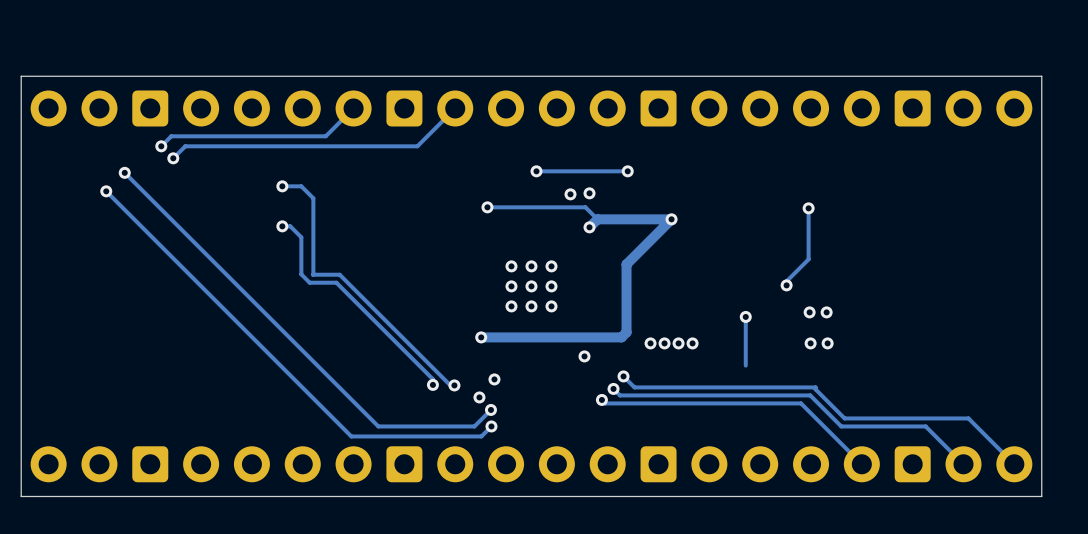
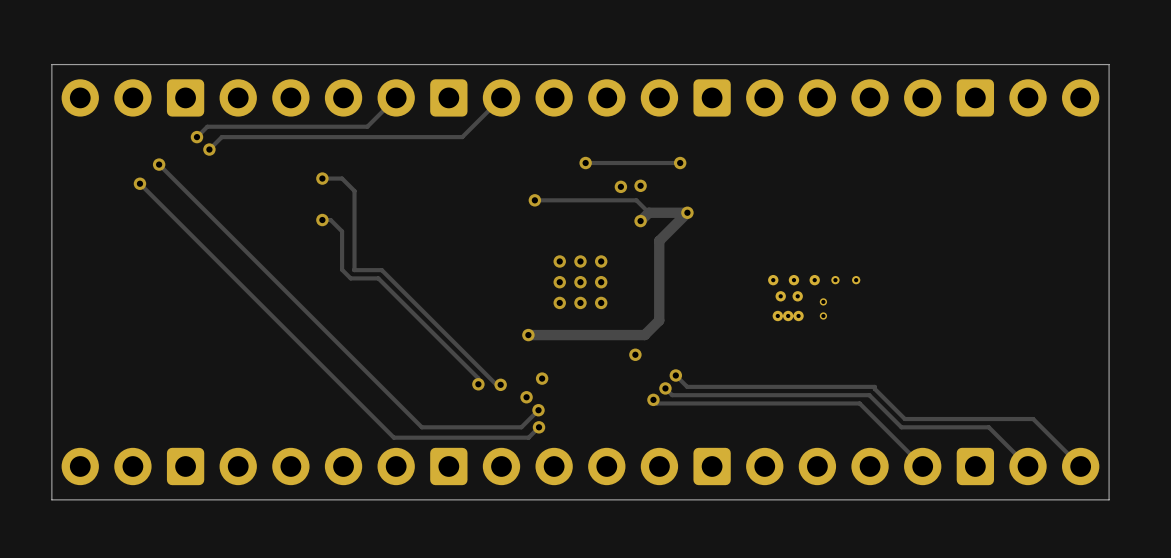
track: (808, 208) (808, 259) (786, 281) (786, 285) -> none
via: (808, 208) -> none
track: (634, 219) (671, 219) (626, 264) (626, 332) (621, 337) (593, 337) -> (687, 212) (659, 240) (659, 320) (644, 335)
via position: (671, 219) -> (687, 212)
via: (786, 285) -> none
part: none -> (814, 298)
via: (809, 312) -> none
via: (826, 312) -> none
track: (745, 316) (745, 365) -> none
via: (745, 316) -> none
via: (650, 343) -> none
via: (664, 343) -> none
via: (678, 343) -> none
via: (692, 343) -> none
via: (810, 343) -> none
via: (827, 343) -> none

